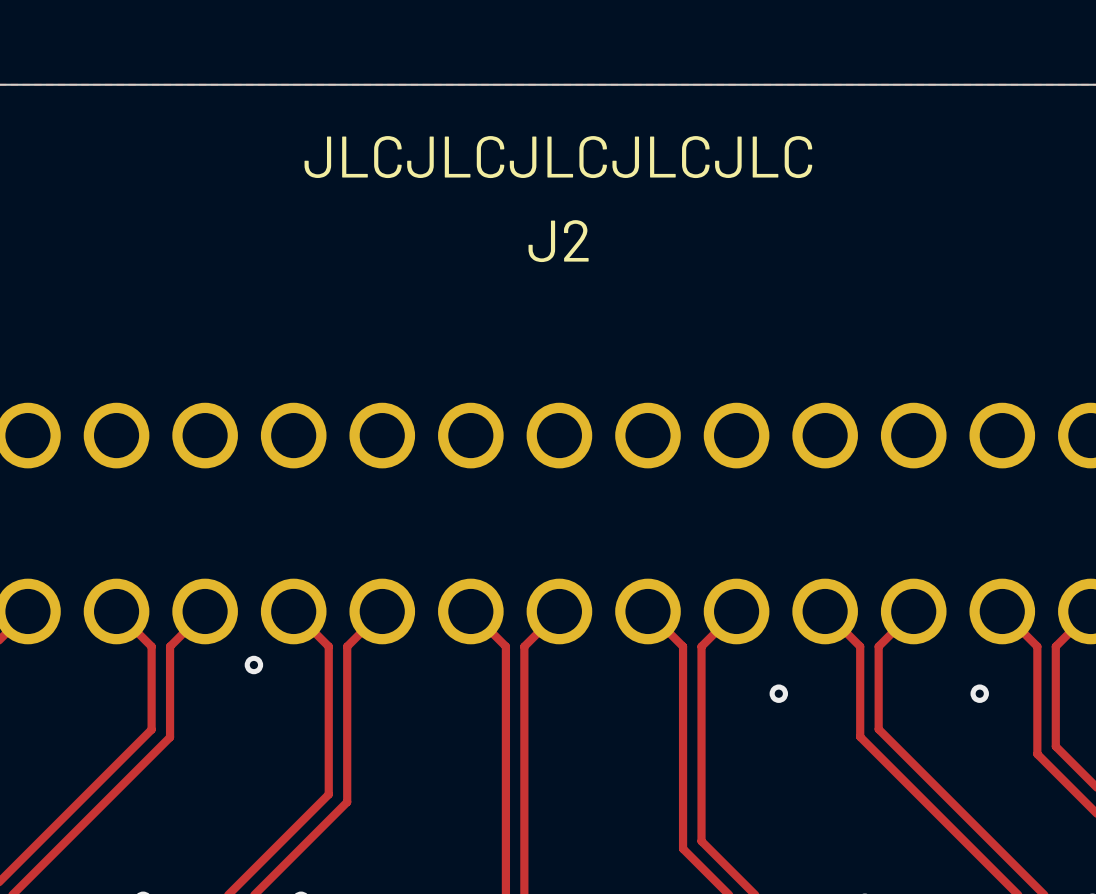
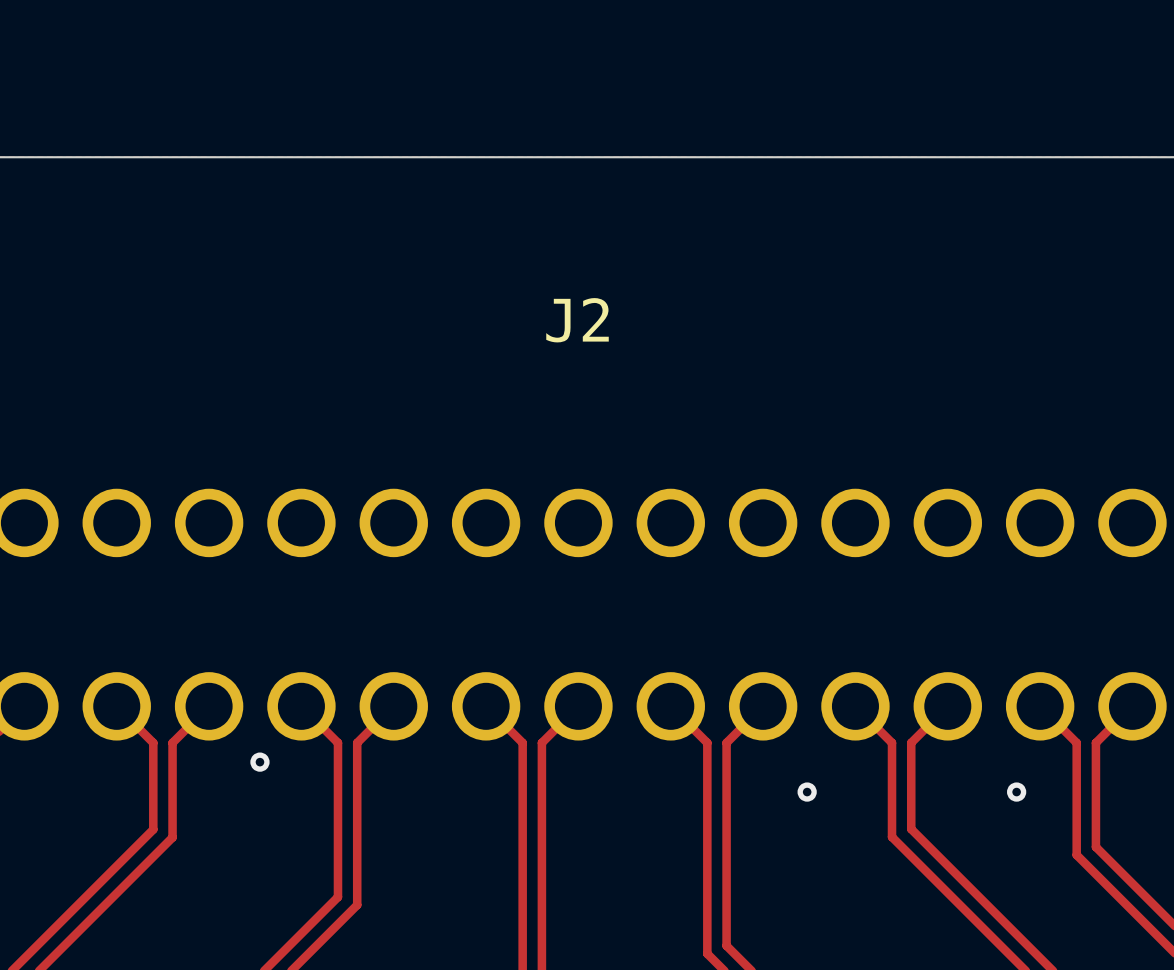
text: JLCJLCJLCJLCJLC (558, 157) -> none

